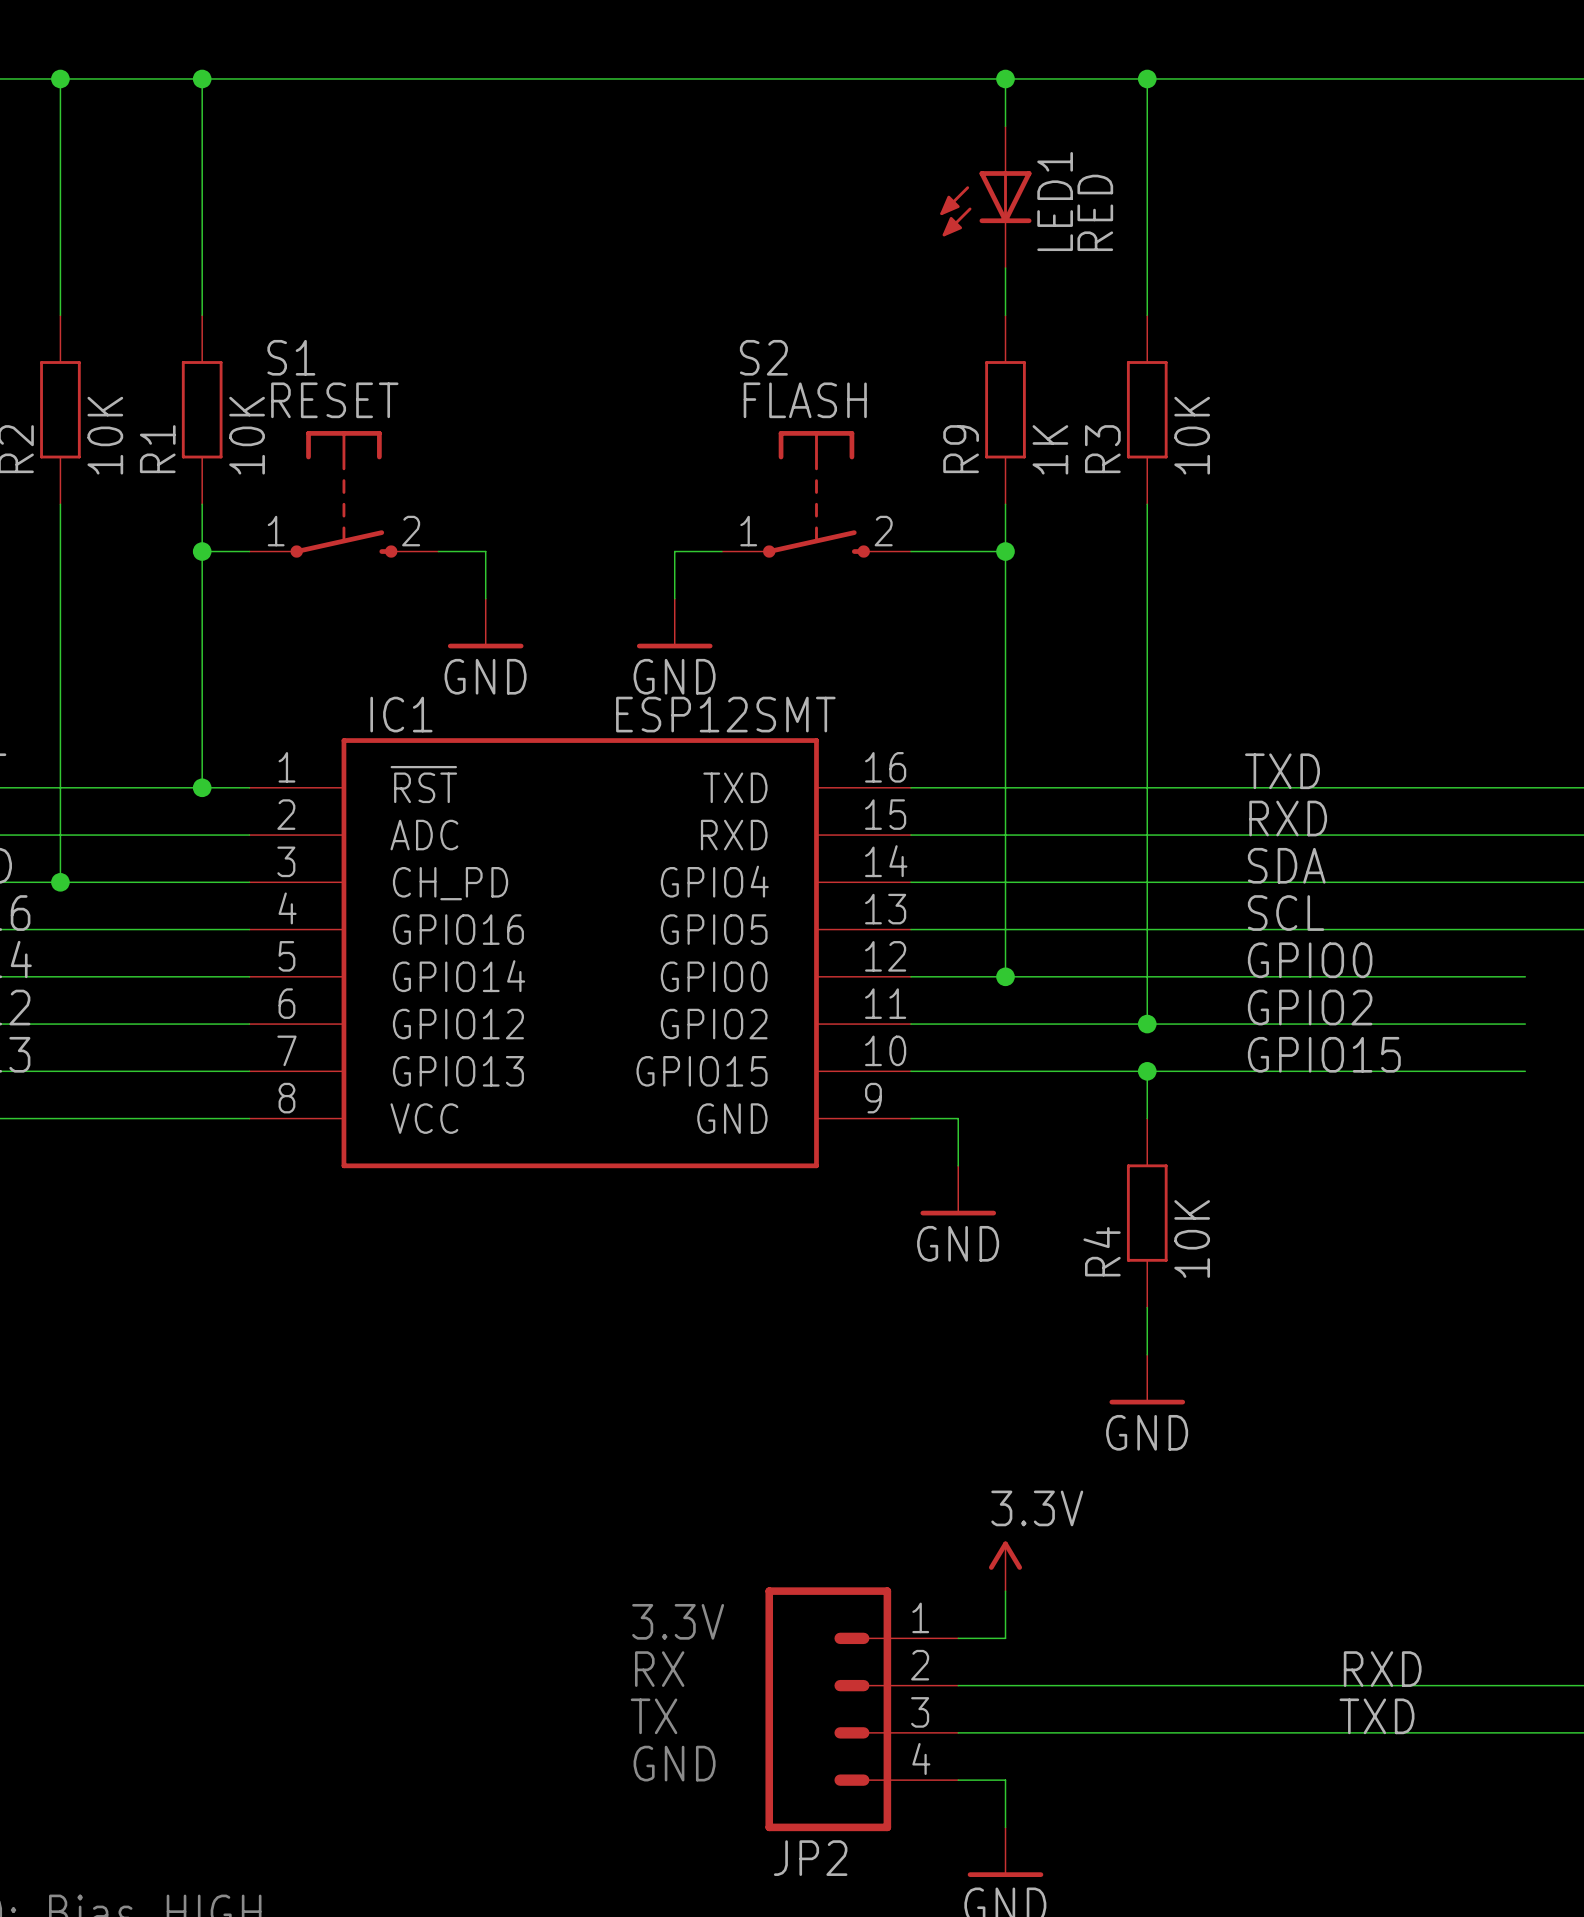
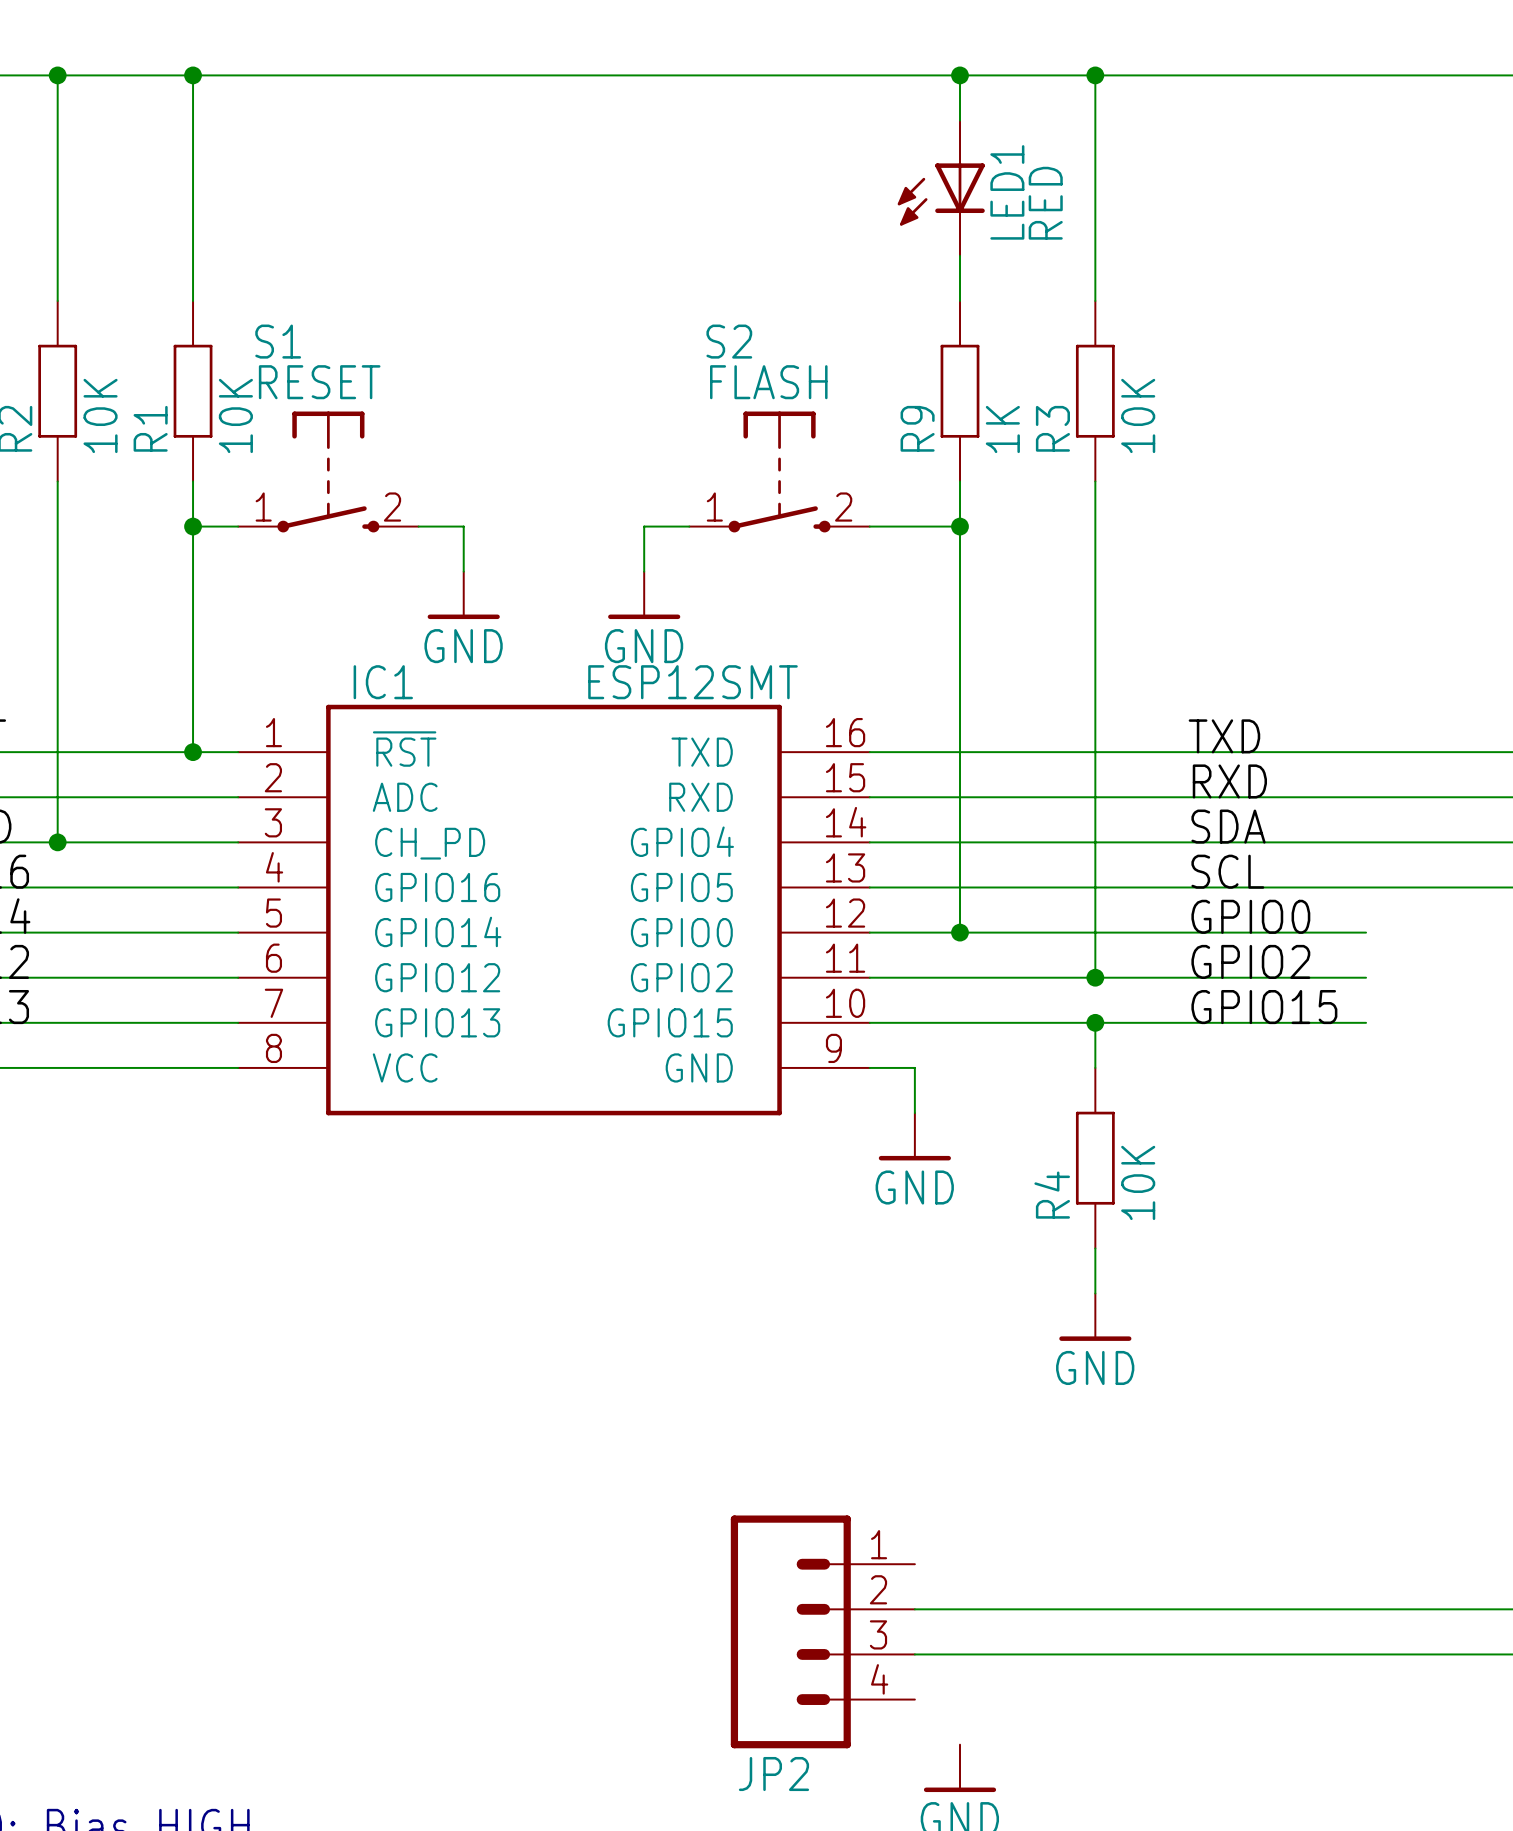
wire: (1430, 976) (1525, 976) -> none
wire: (1430, 1024) (1525, 1024) -> none
wire: (1430, 1071) (1525, 1071) -> none
power symbol: 3.3V (1005, 1566) -> none
wire: (1005, 1591) (1005, 1638) (958, 1638) -> none
text: 3.3V (678, 1621) -> none
text: RX (659, 1669) -> none
label: RXD (1382, 1669) -> none
text: TX (654, 1716) -> none
label: TXD (1377, 1716) -> none
text: GND (674, 1763) -> none
wire: (958, 1780) (1005, 1780) (1005, 1827) -> none

